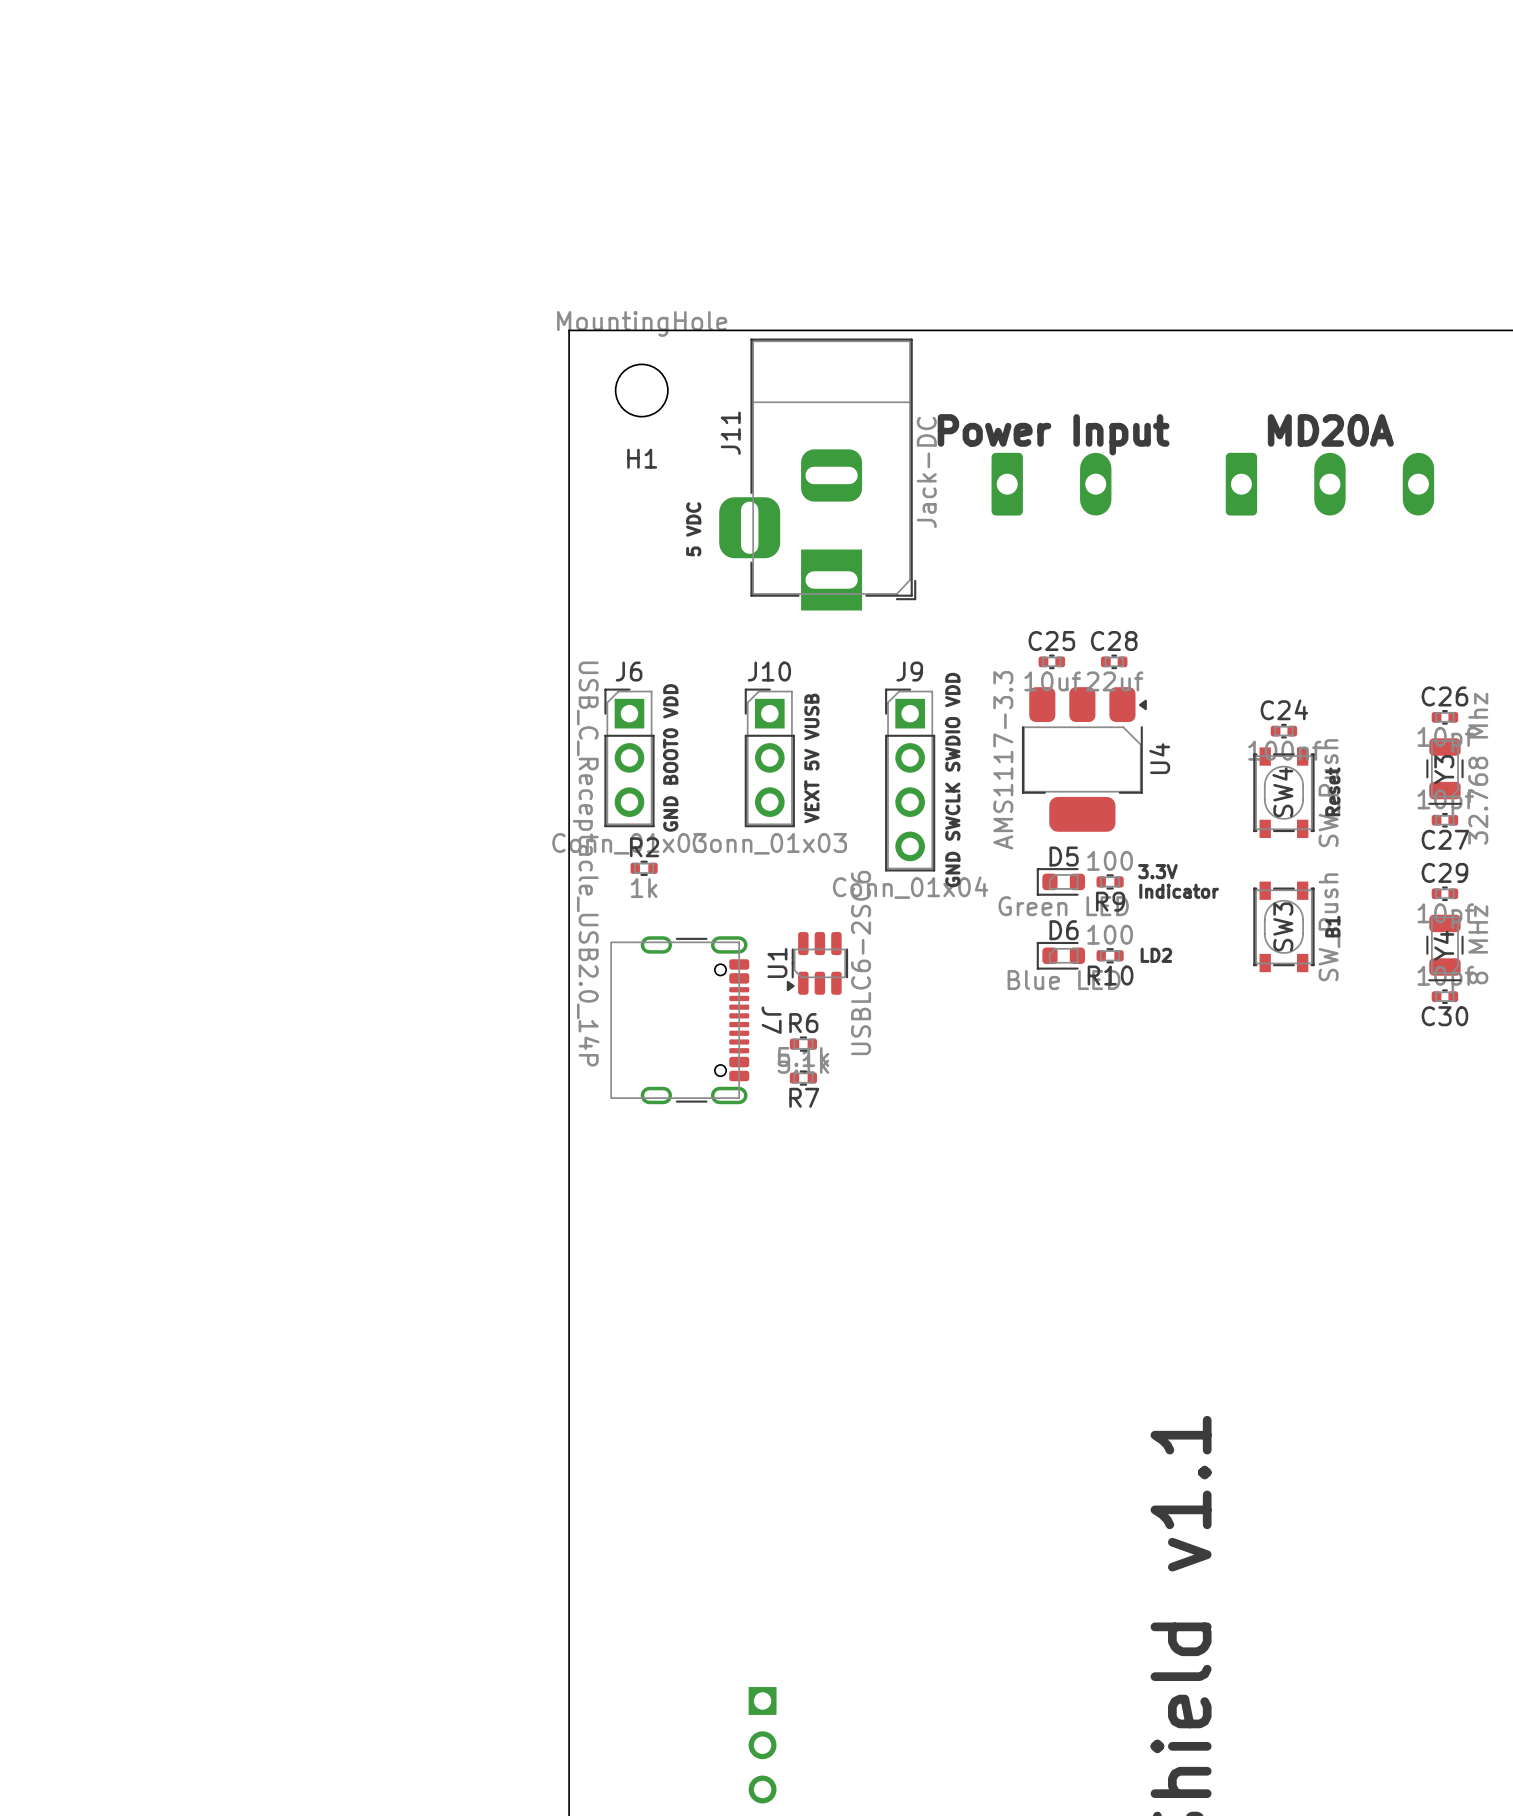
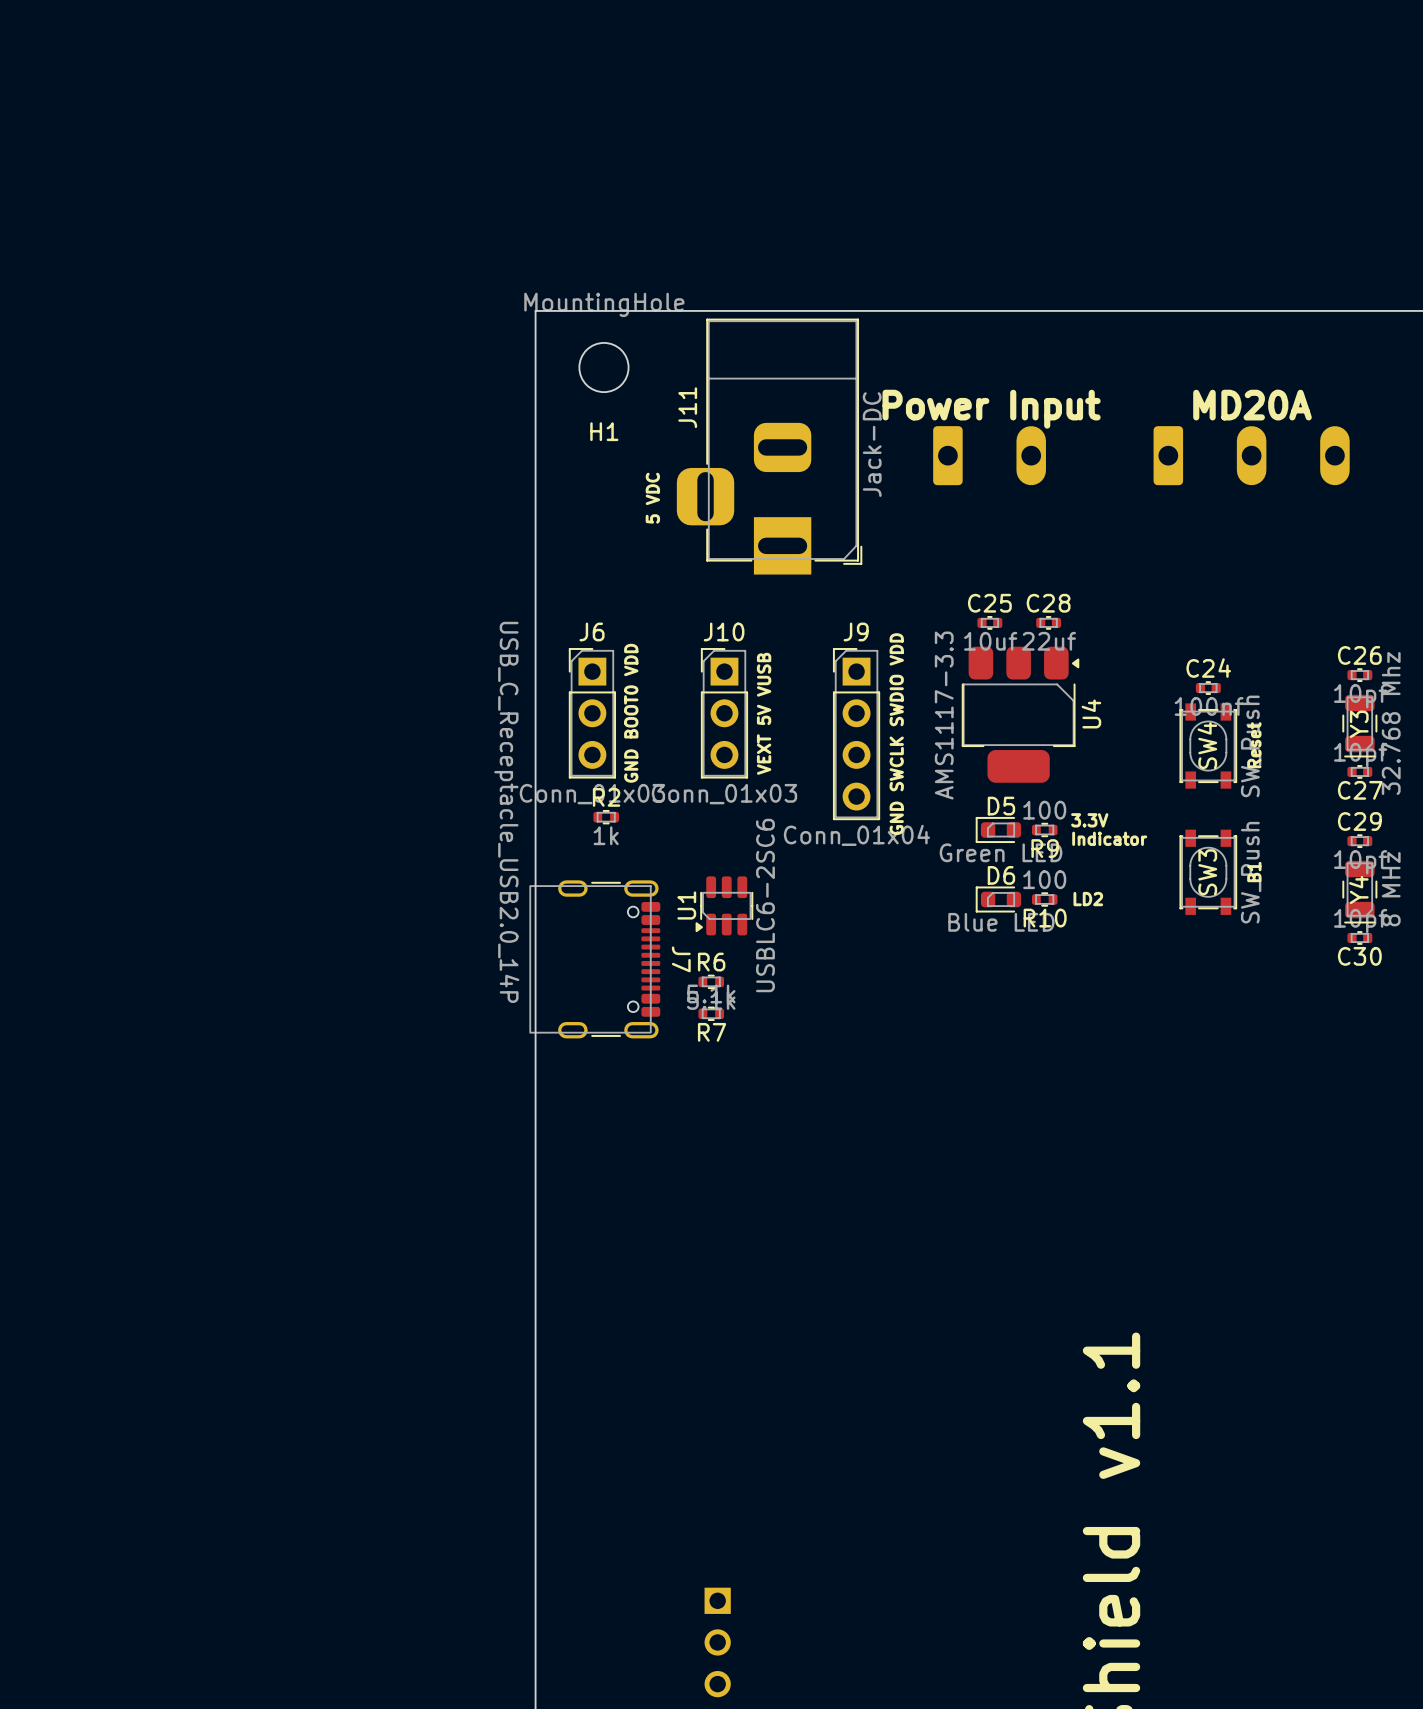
U1 position: (817, 963) -> (724, 905)
J7 position: (679, 1020) -> (594, 959)
R6 position: (803, 1044) -> (711, 981)
R7 position: (803, 1078) -> (711, 1013)

